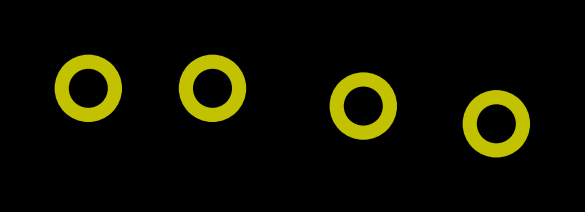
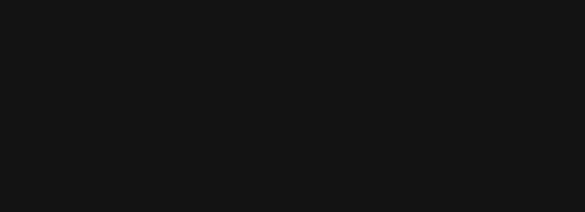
part: (88, 88) -> none
part: (212, 88) -> none
part: (363, 106) -> none
part: (496, 123) -> none

